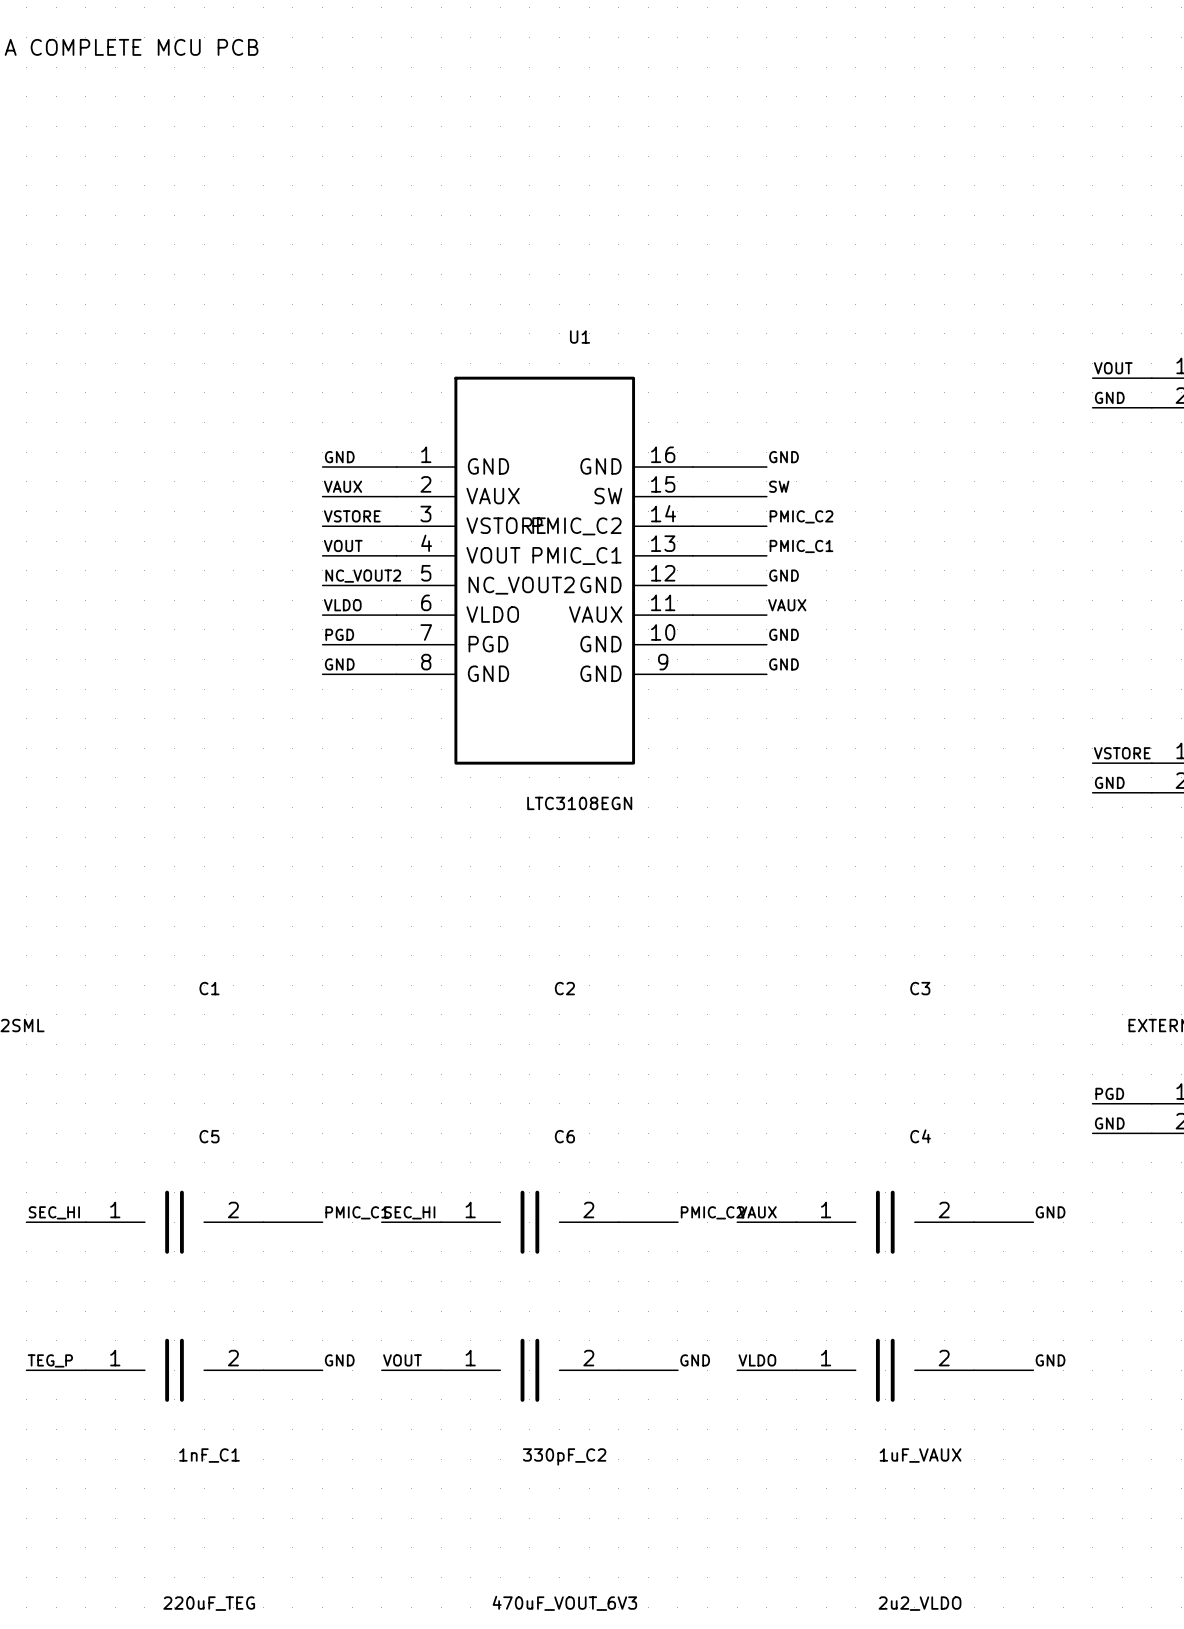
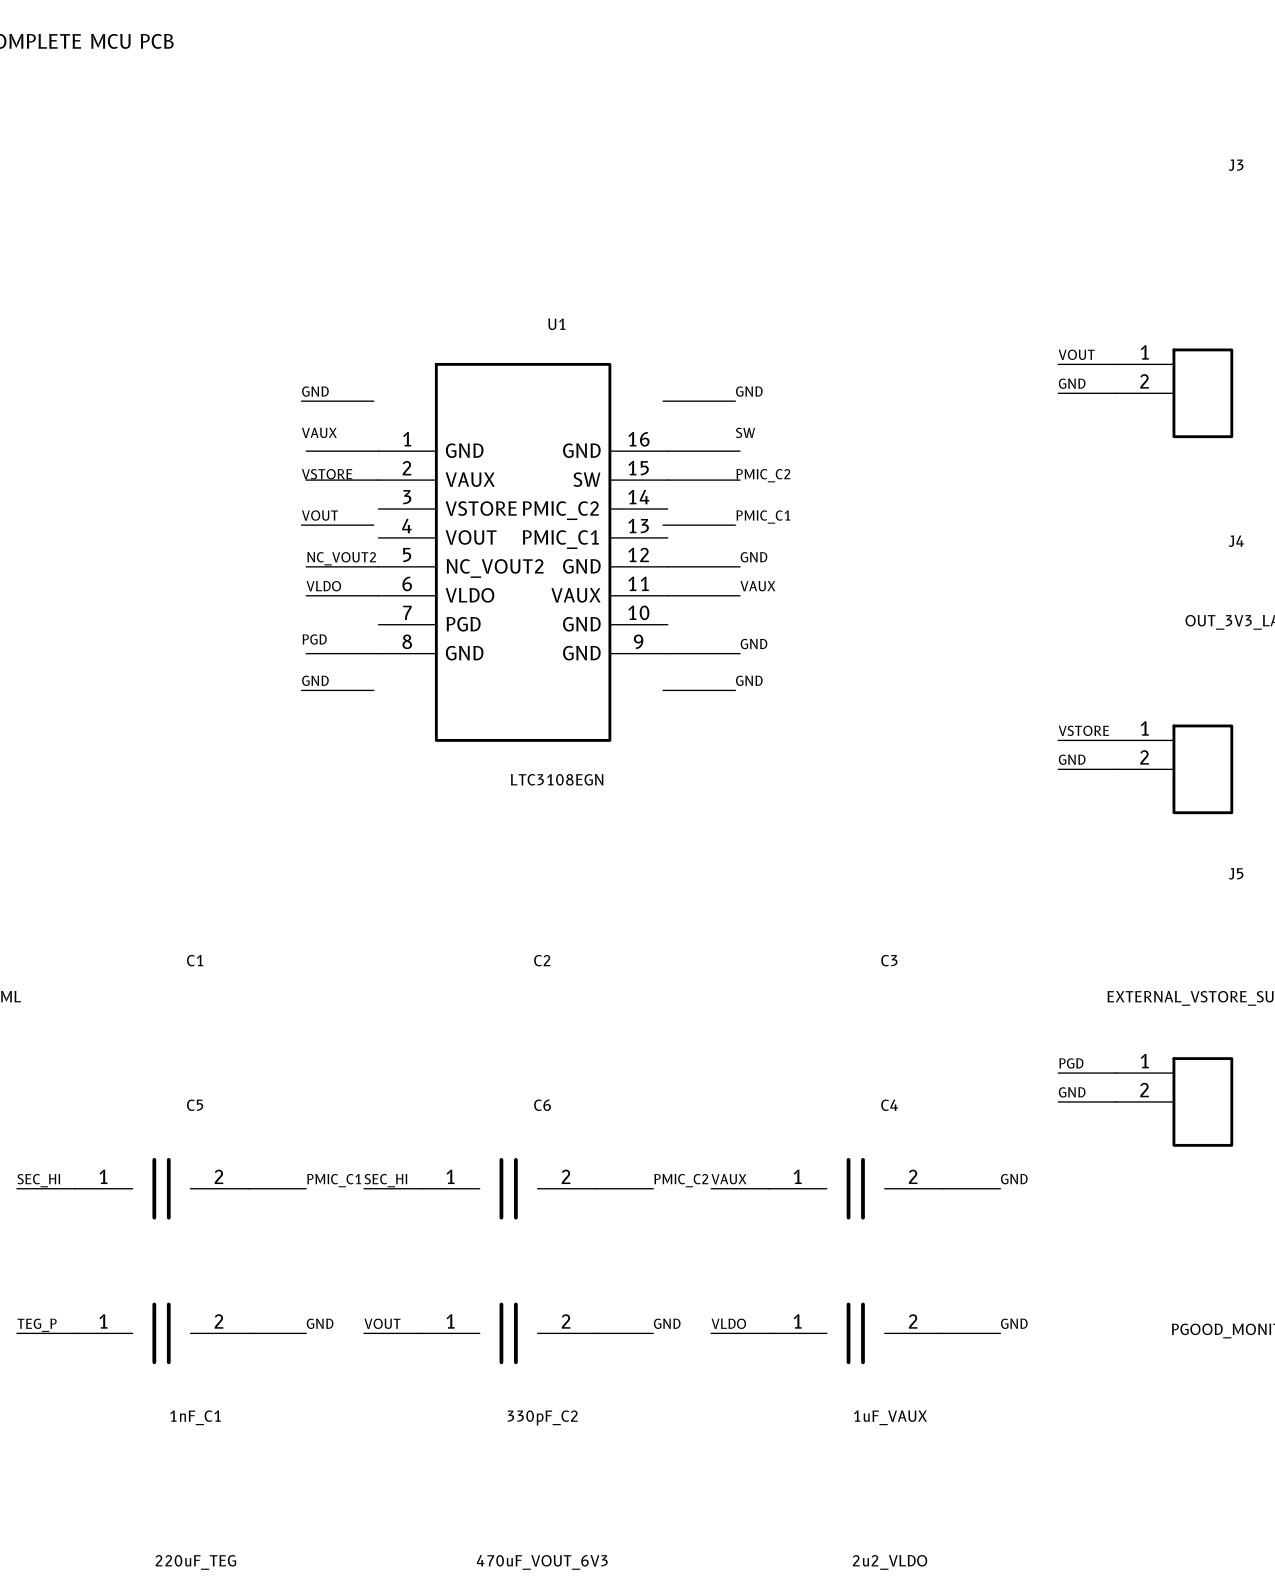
label position: GND (339, 457) -> GND (315, 391)
label position: GND (784, 457) -> GND (749, 391)
label position: VAUX (343, 486) -> VAUX (319, 432)
label position: SW (779, 486) -> SW (745, 432)
label position: VSTORE (352, 516) -> VSTORE (327, 474)
label position: PMIC_C2 (801, 516) -> PMIC_C2 (763, 475)
wire: (322, 526) (396, 526) -> (301, 401) (373, 401)
wire: (692, 526) (766, 526) -> (663, 401) (735, 401)
label position: VOUT (343, 545) -> VOUT (319, 515)
label position: PMIC_C1 (801, 546) -> PMIC_C1 (763, 517)
wire: (322, 555) (396, 555) -> (301, 525) (373, 525)
wire: (692, 555) (766, 555) -> (663, 525) (735, 525)
label position: PGD (339, 634) -> PGD (314, 639)
label position: GND (784, 634) -> GND (749, 680)
wire: (322, 644) (396, 644) -> (301, 690) (373, 690)
wire: (692, 644) (766, 644) -> (663, 690) (735, 690)
label position: GND (339, 664) -> GND (315, 680)

